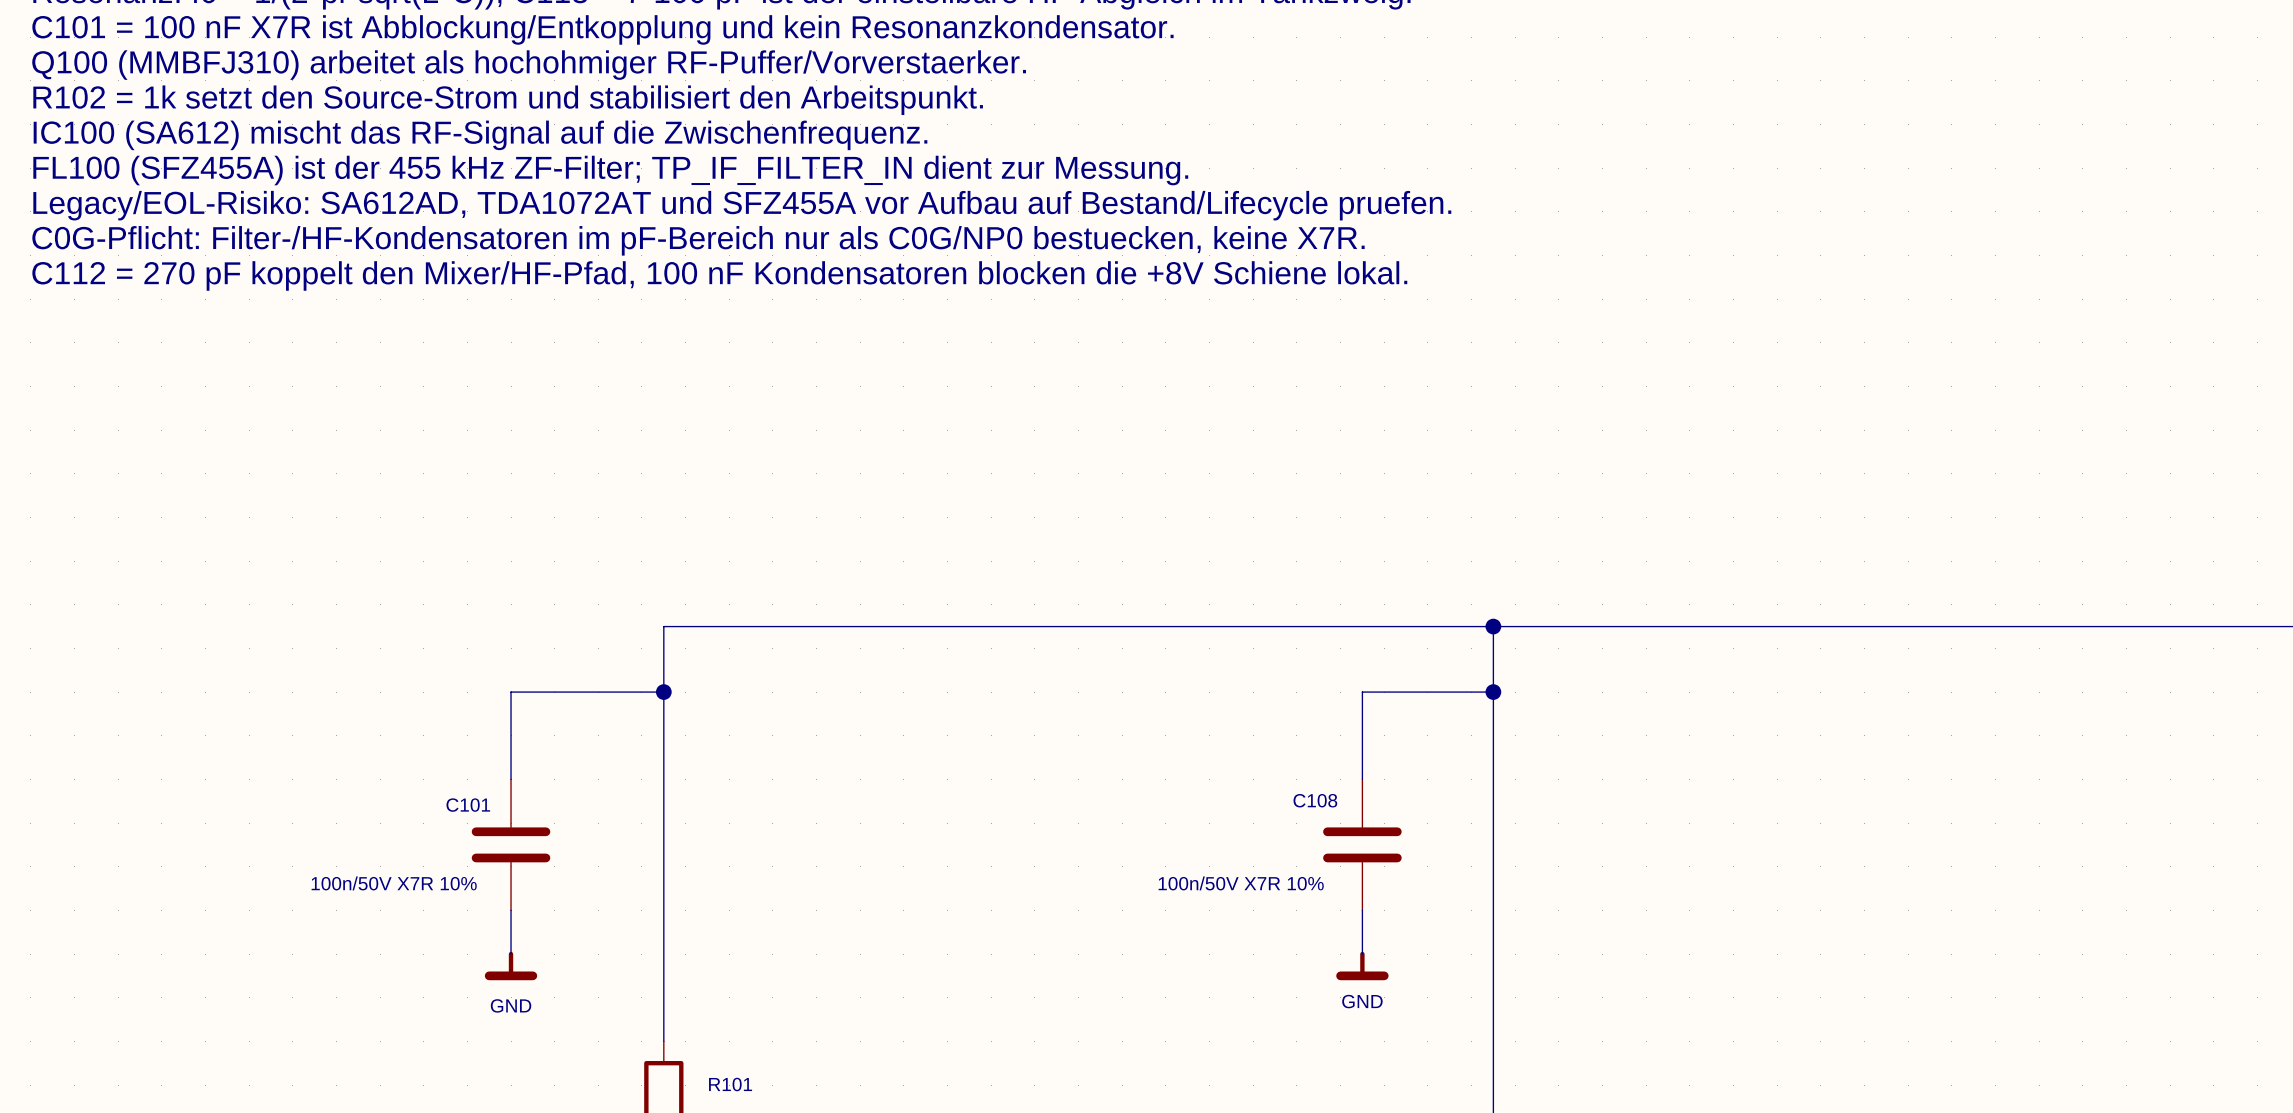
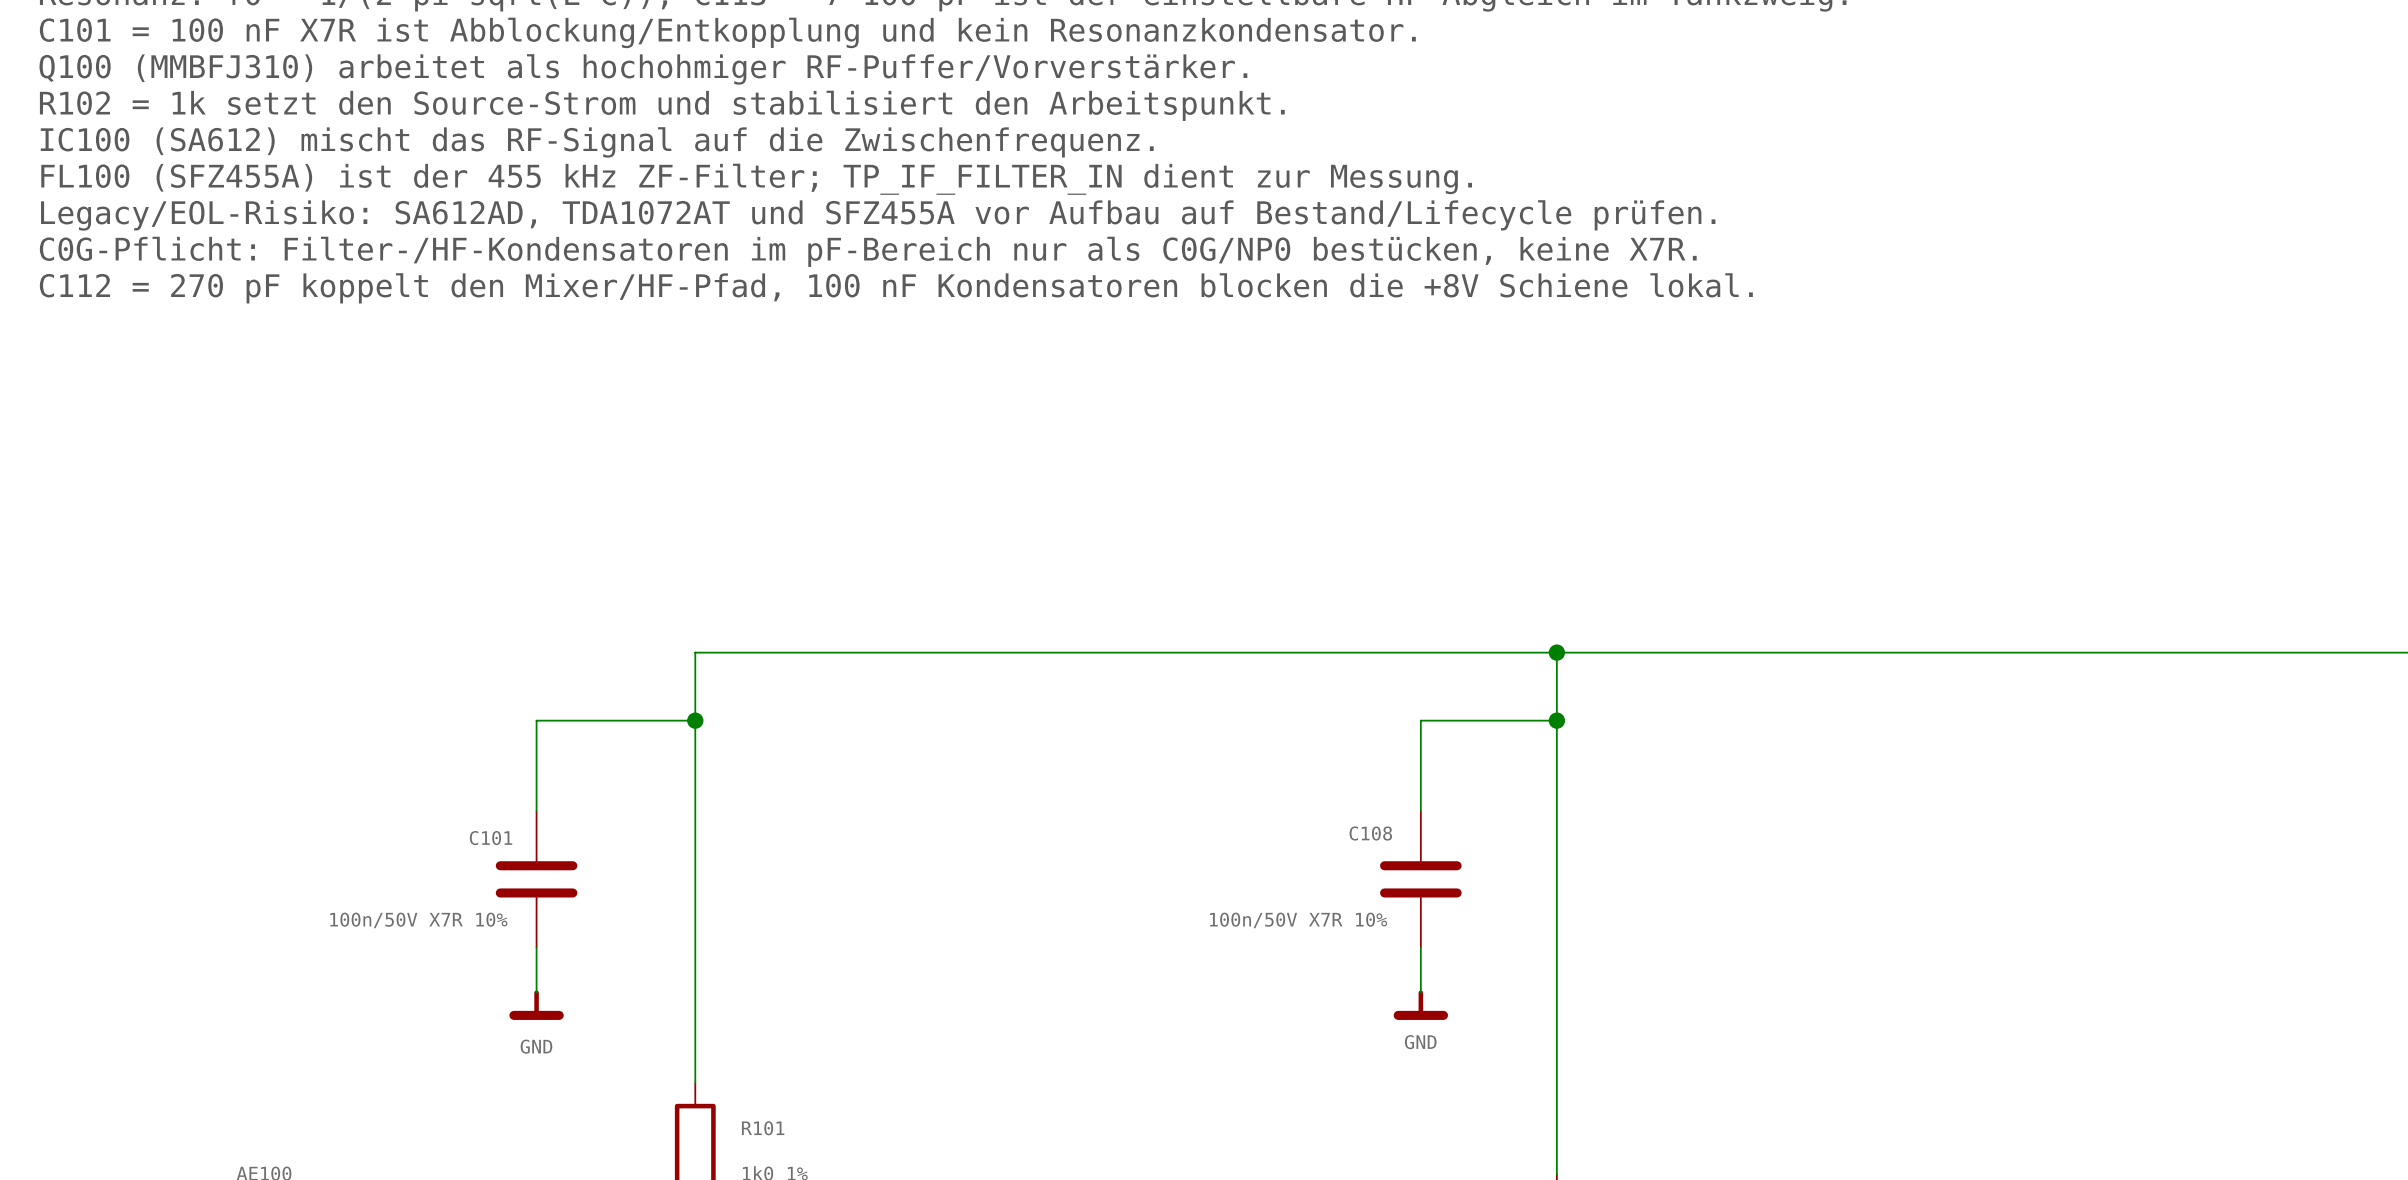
text: Q100 (MMBFJ310) arbeitet als hochohmiger RF-Puffer/Vorverstaerker. (529, 65) -> Q100 (MMBFJ310) arbeitet als hochohmiger RF-Puffer/Vorverstärker. (643, 69)
text: Legacy/EOL-Risiko: SA612AD, TDA1072AT und SFZ455A vor Aufbau auf Bestand/Lifecycle pruefen. (742, 205) -> Legacy/EOL-Risiko: SA612AD, TDA1072AT und SFZ455A vor Aufbau auf Bestand/Lifecycle prüfen. (878, 215)
text: C0G-Pflicht: Filter-/HF-Kondensatoren im pF-Bereich nur als C0G/NP0 bestuecken, keine X7R. (698, 240) -> C0G-Pflicht: Filter-/HF-Kondensatoren im pF-Bereich nur als C0G/NP0 bestücken, keine X7R. (868, 251)

